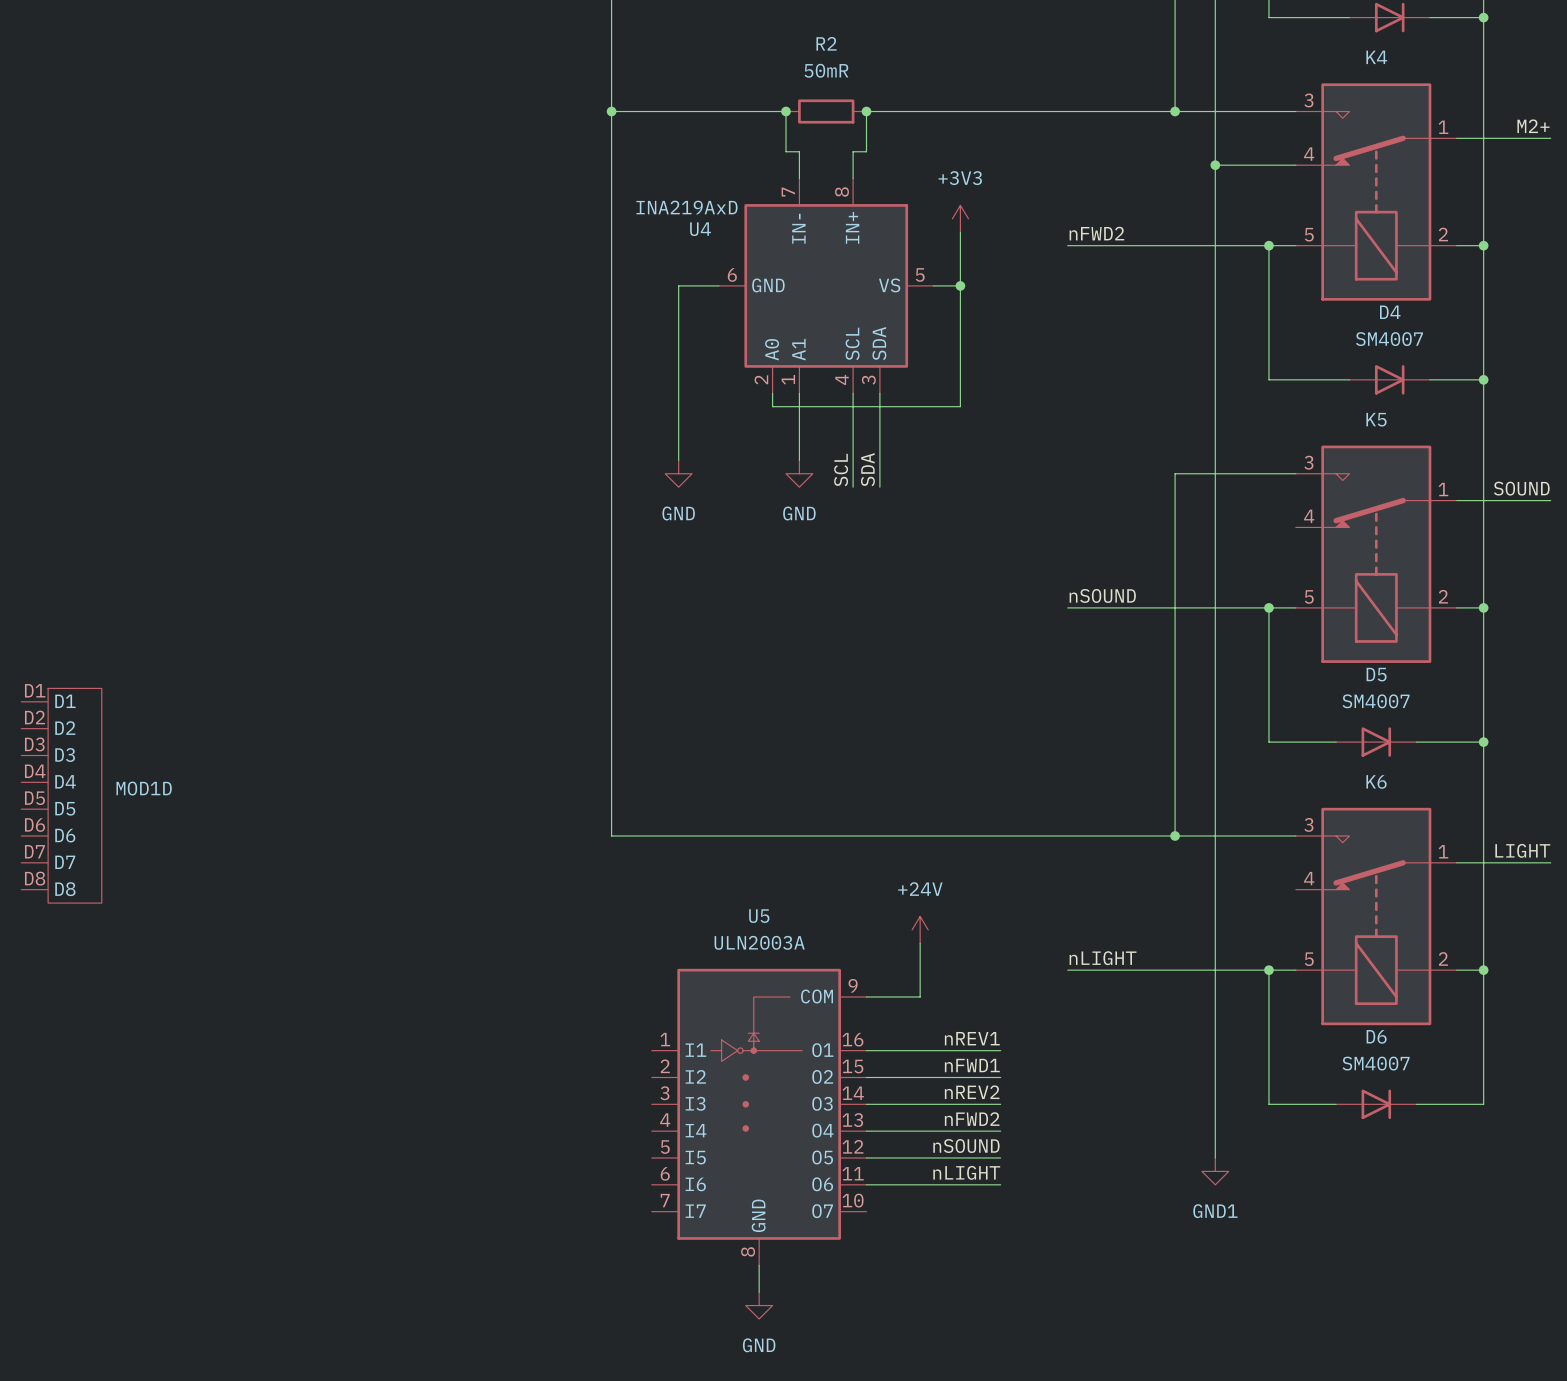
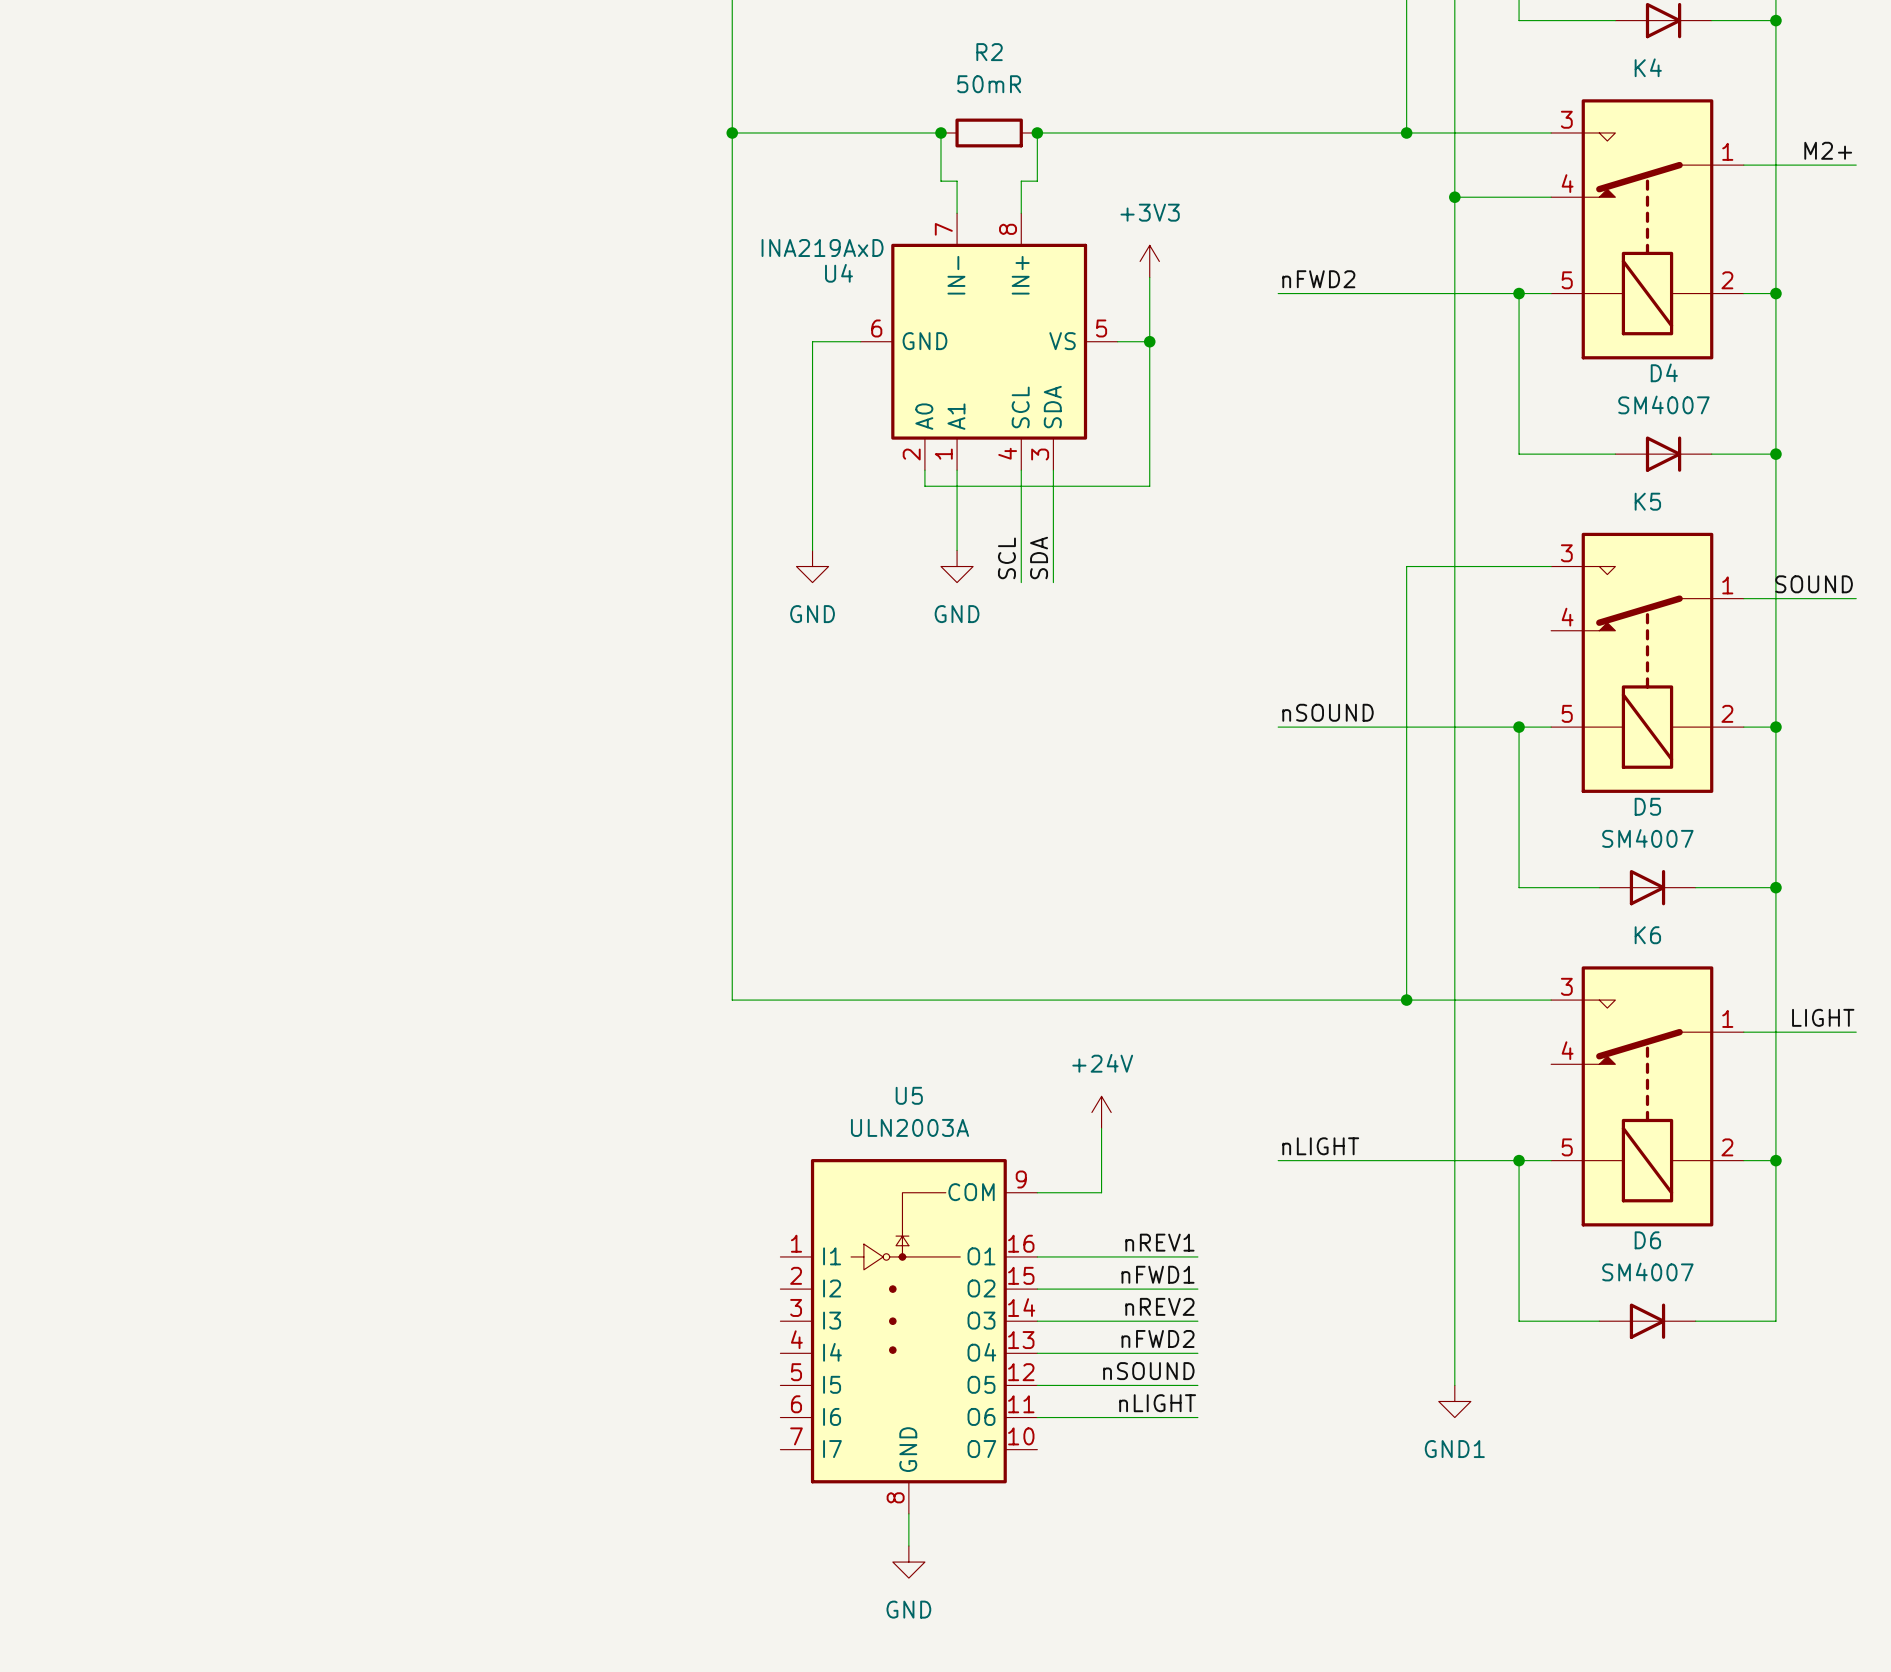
MOD1D: (61, 795) -> none

